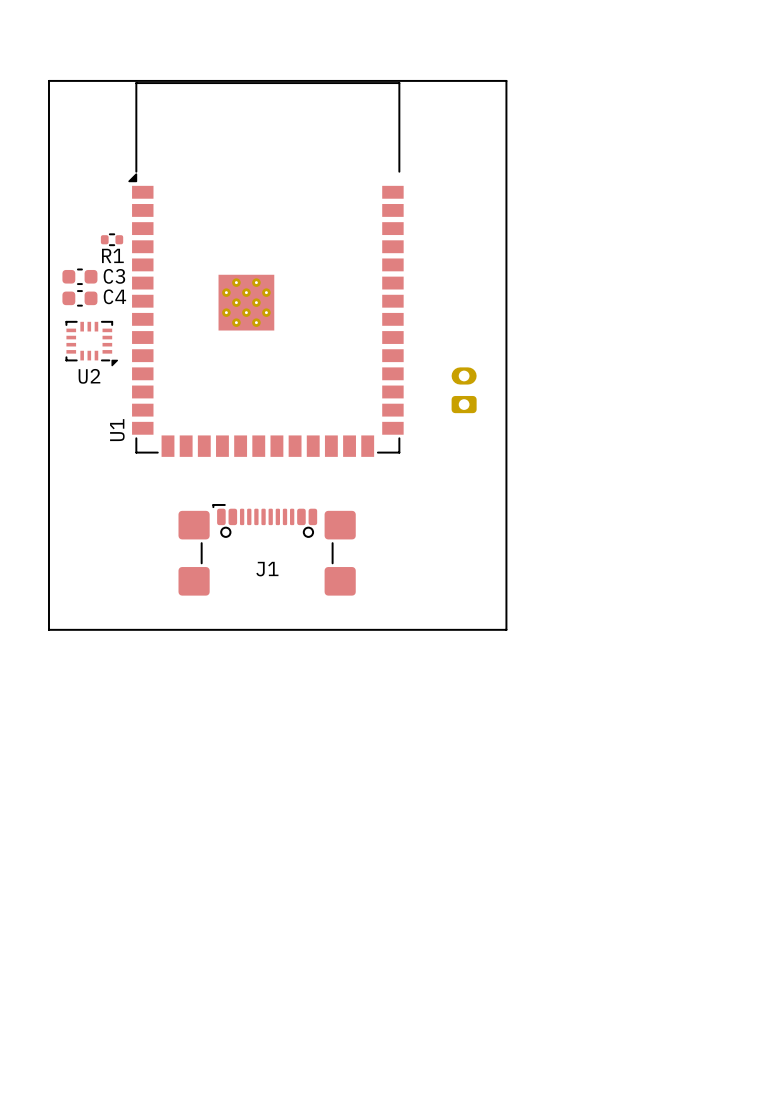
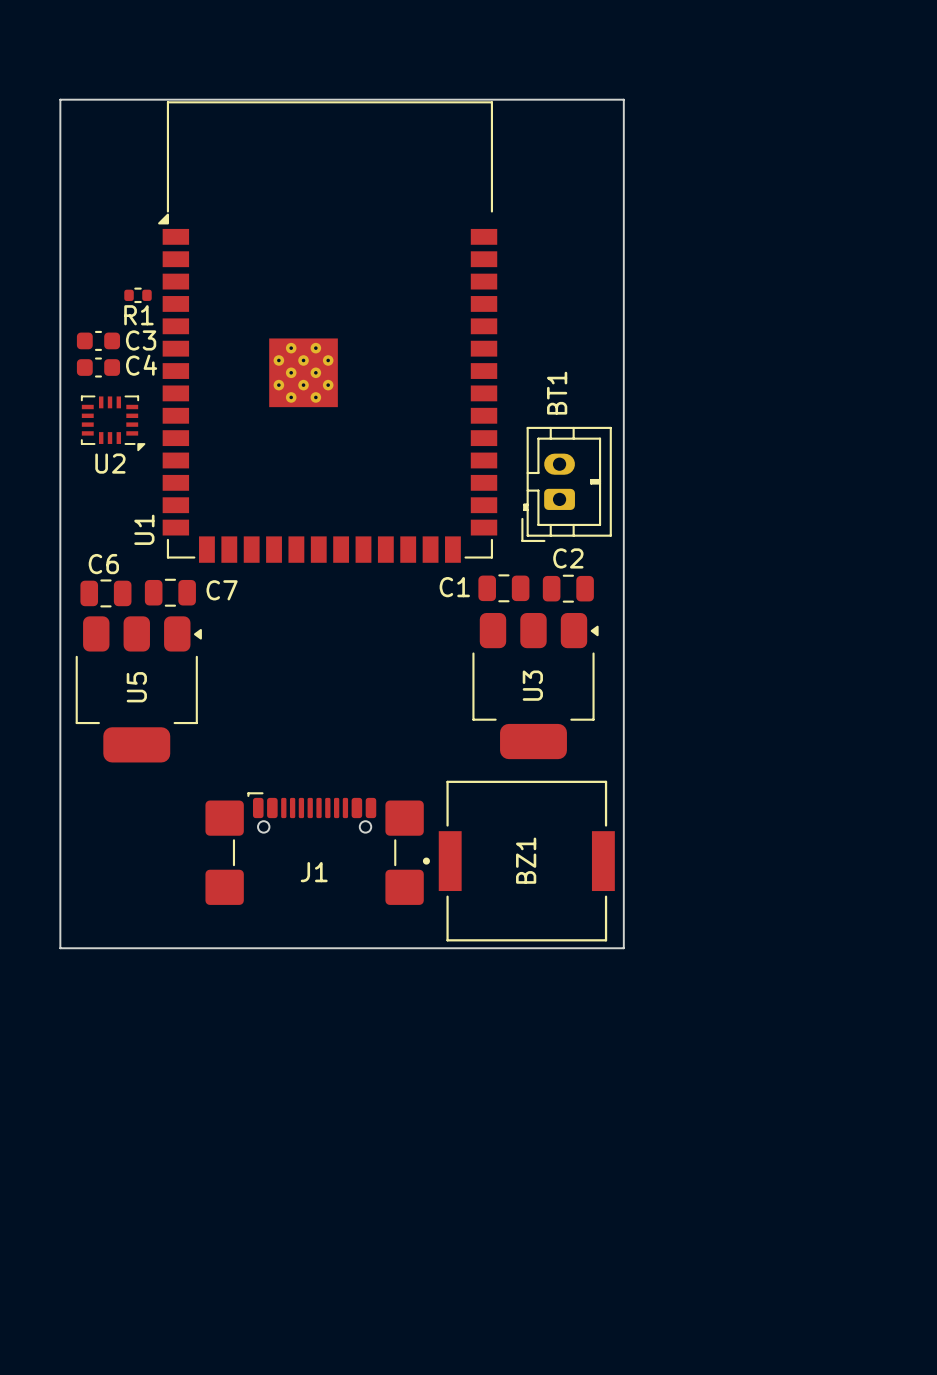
BT1 side: bottom (464, 390) -> top (566, 484)
C1: none -> (503, 588)
C2: none -> (568, 588)
C6: none -> (105, 593)
C7: none -> (170, 592)
J1 position: (267, 549) -> (314, 848)
U3: none -> (535, 686)
U5: none -> (138, 689)
board edge: (48, 629) (506, 629) -> (60, 775) (60, 948) (623, 948) (623, 775)
BZ1: none -> (518, 861)

